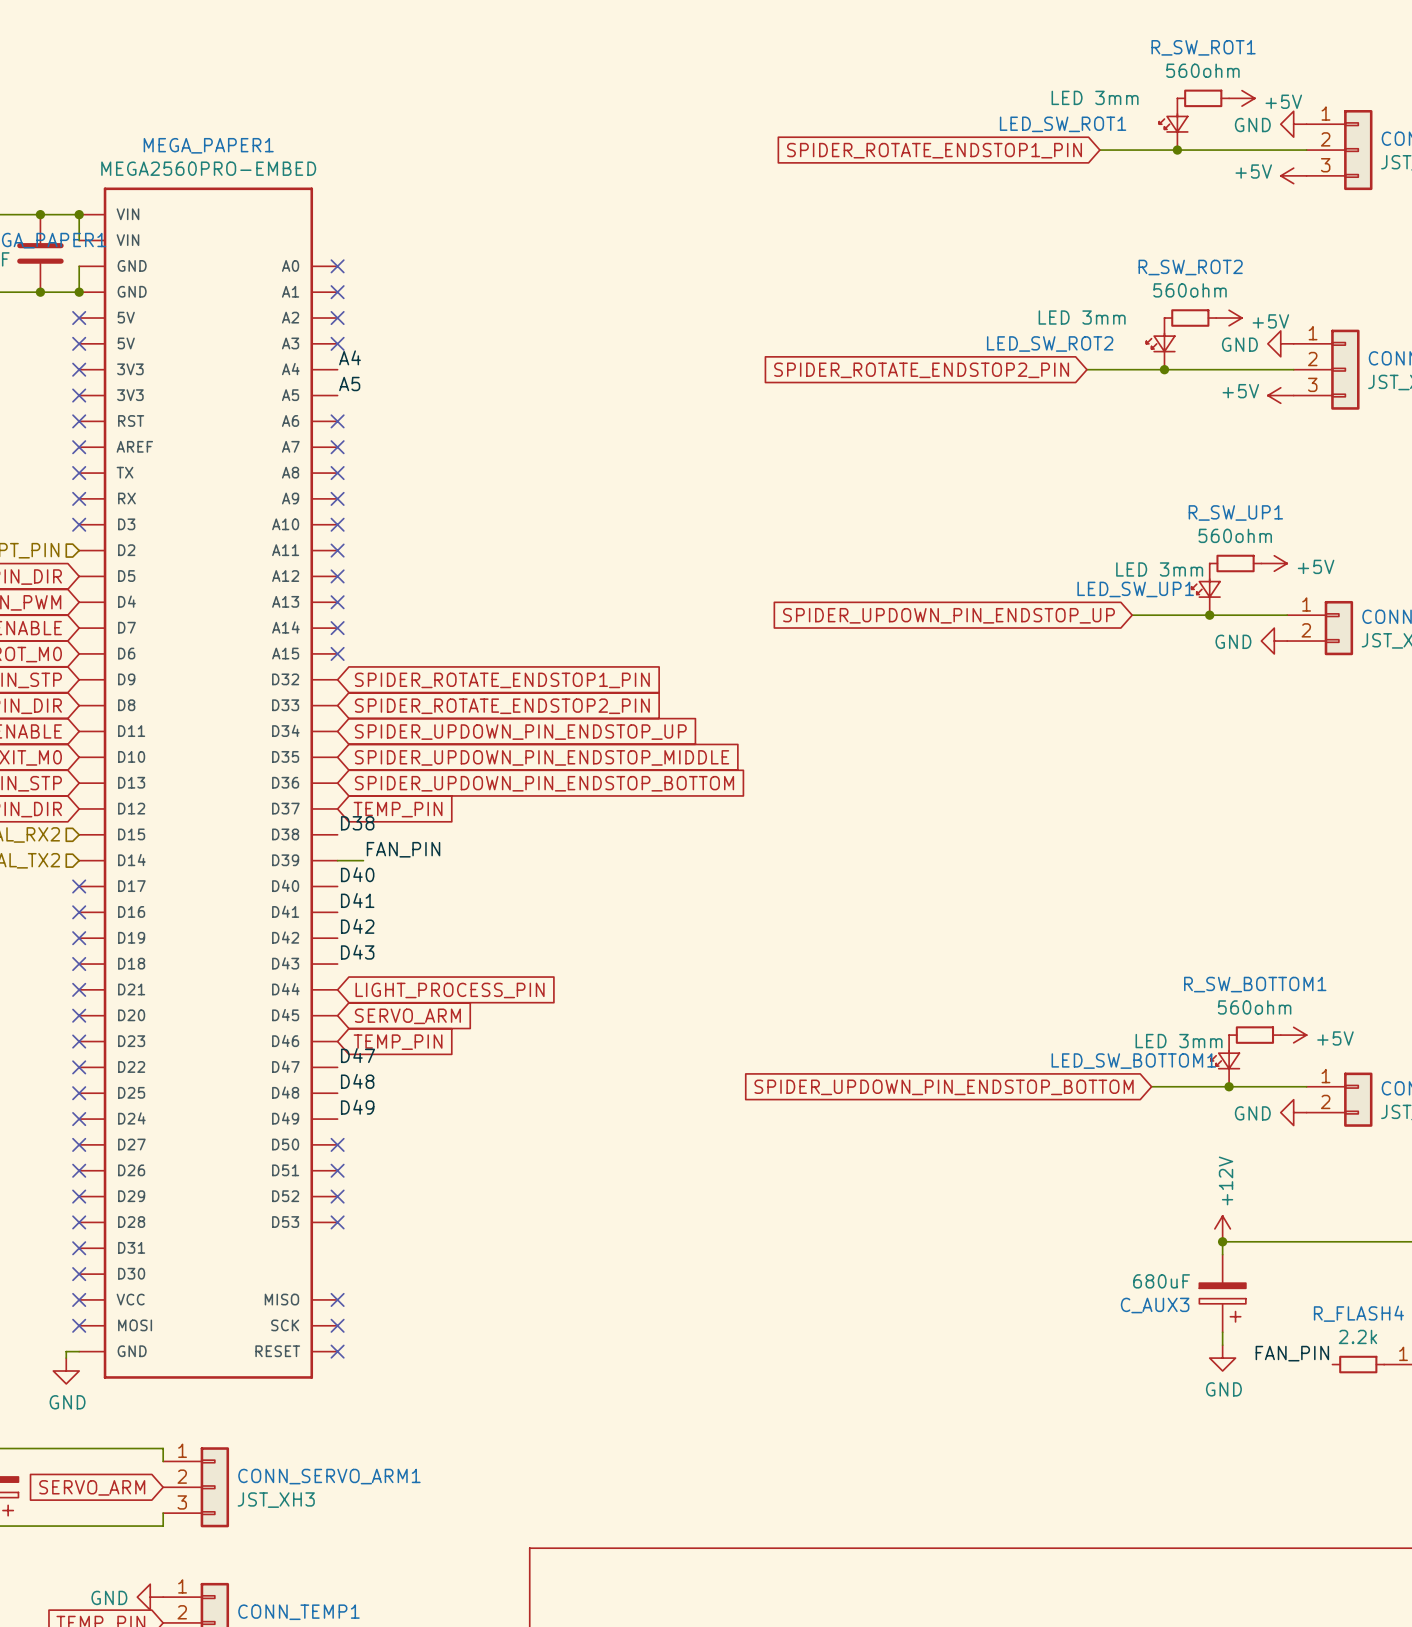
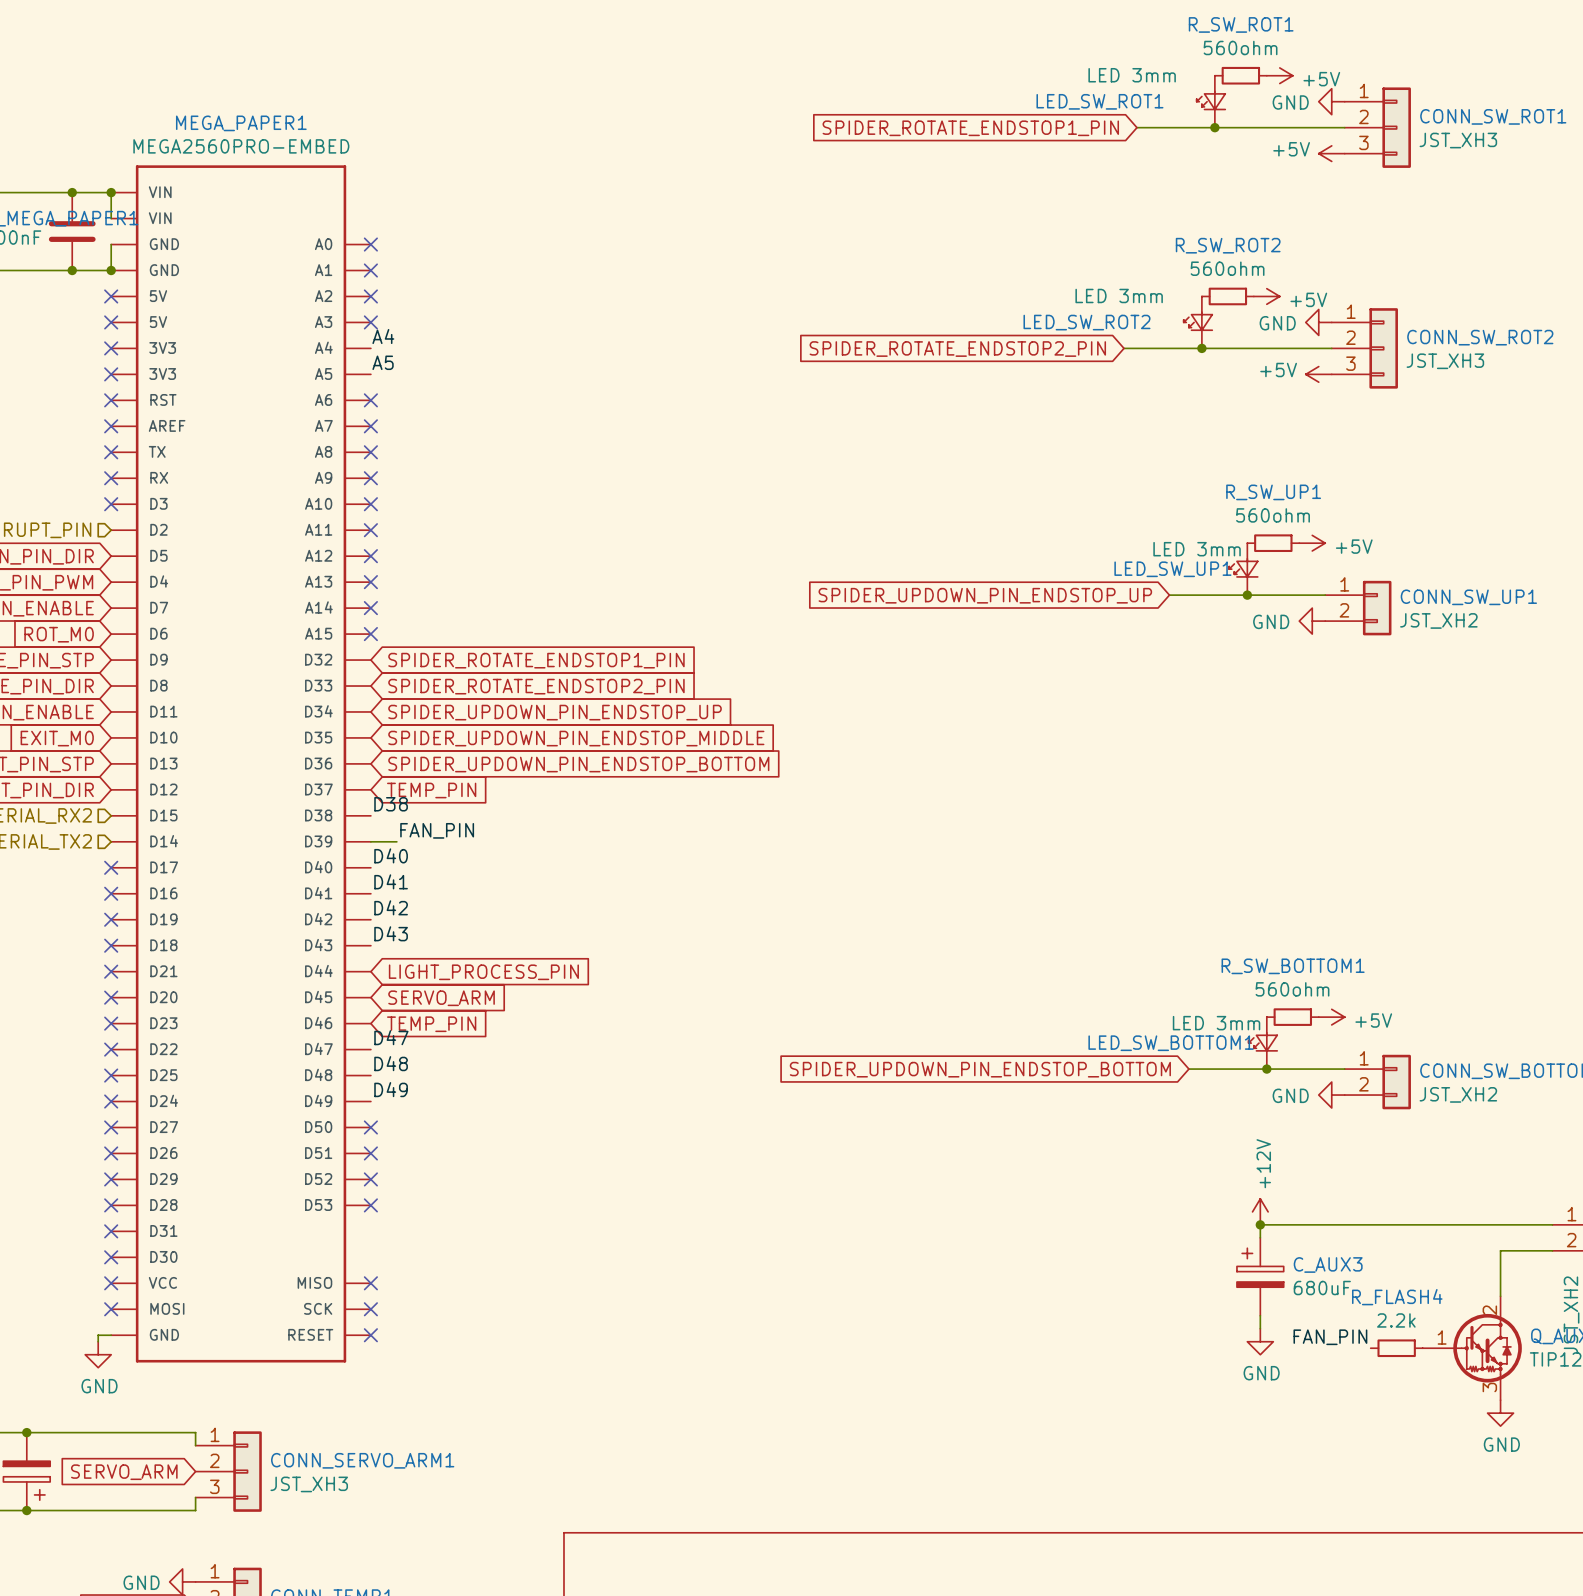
C_AUX3 rotation: 0° (1222, 1302) -> 180° (1260, 1267)

